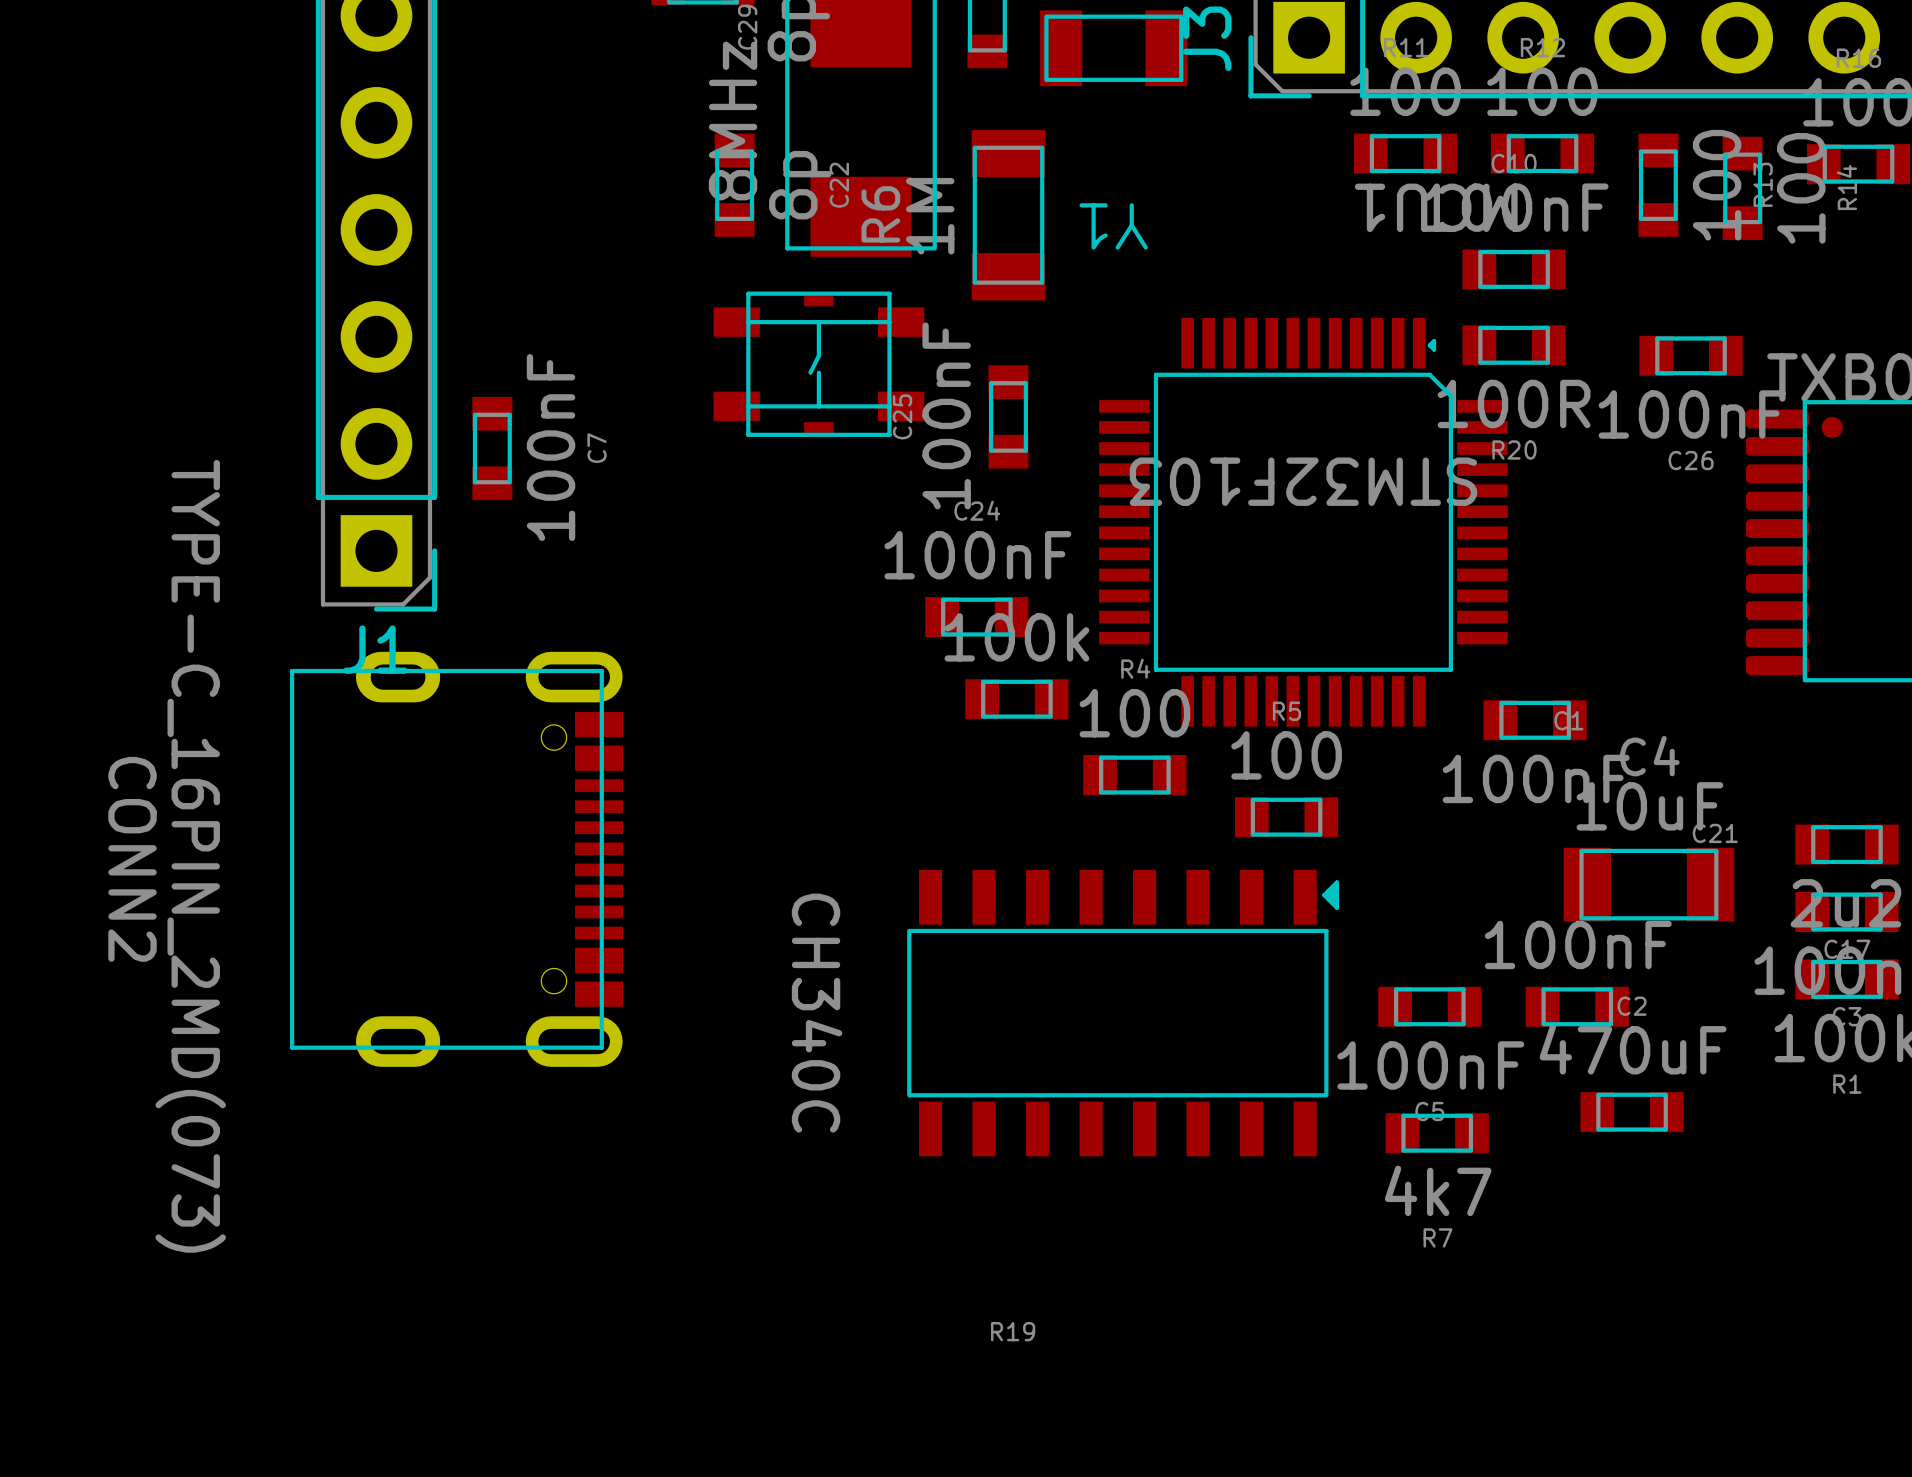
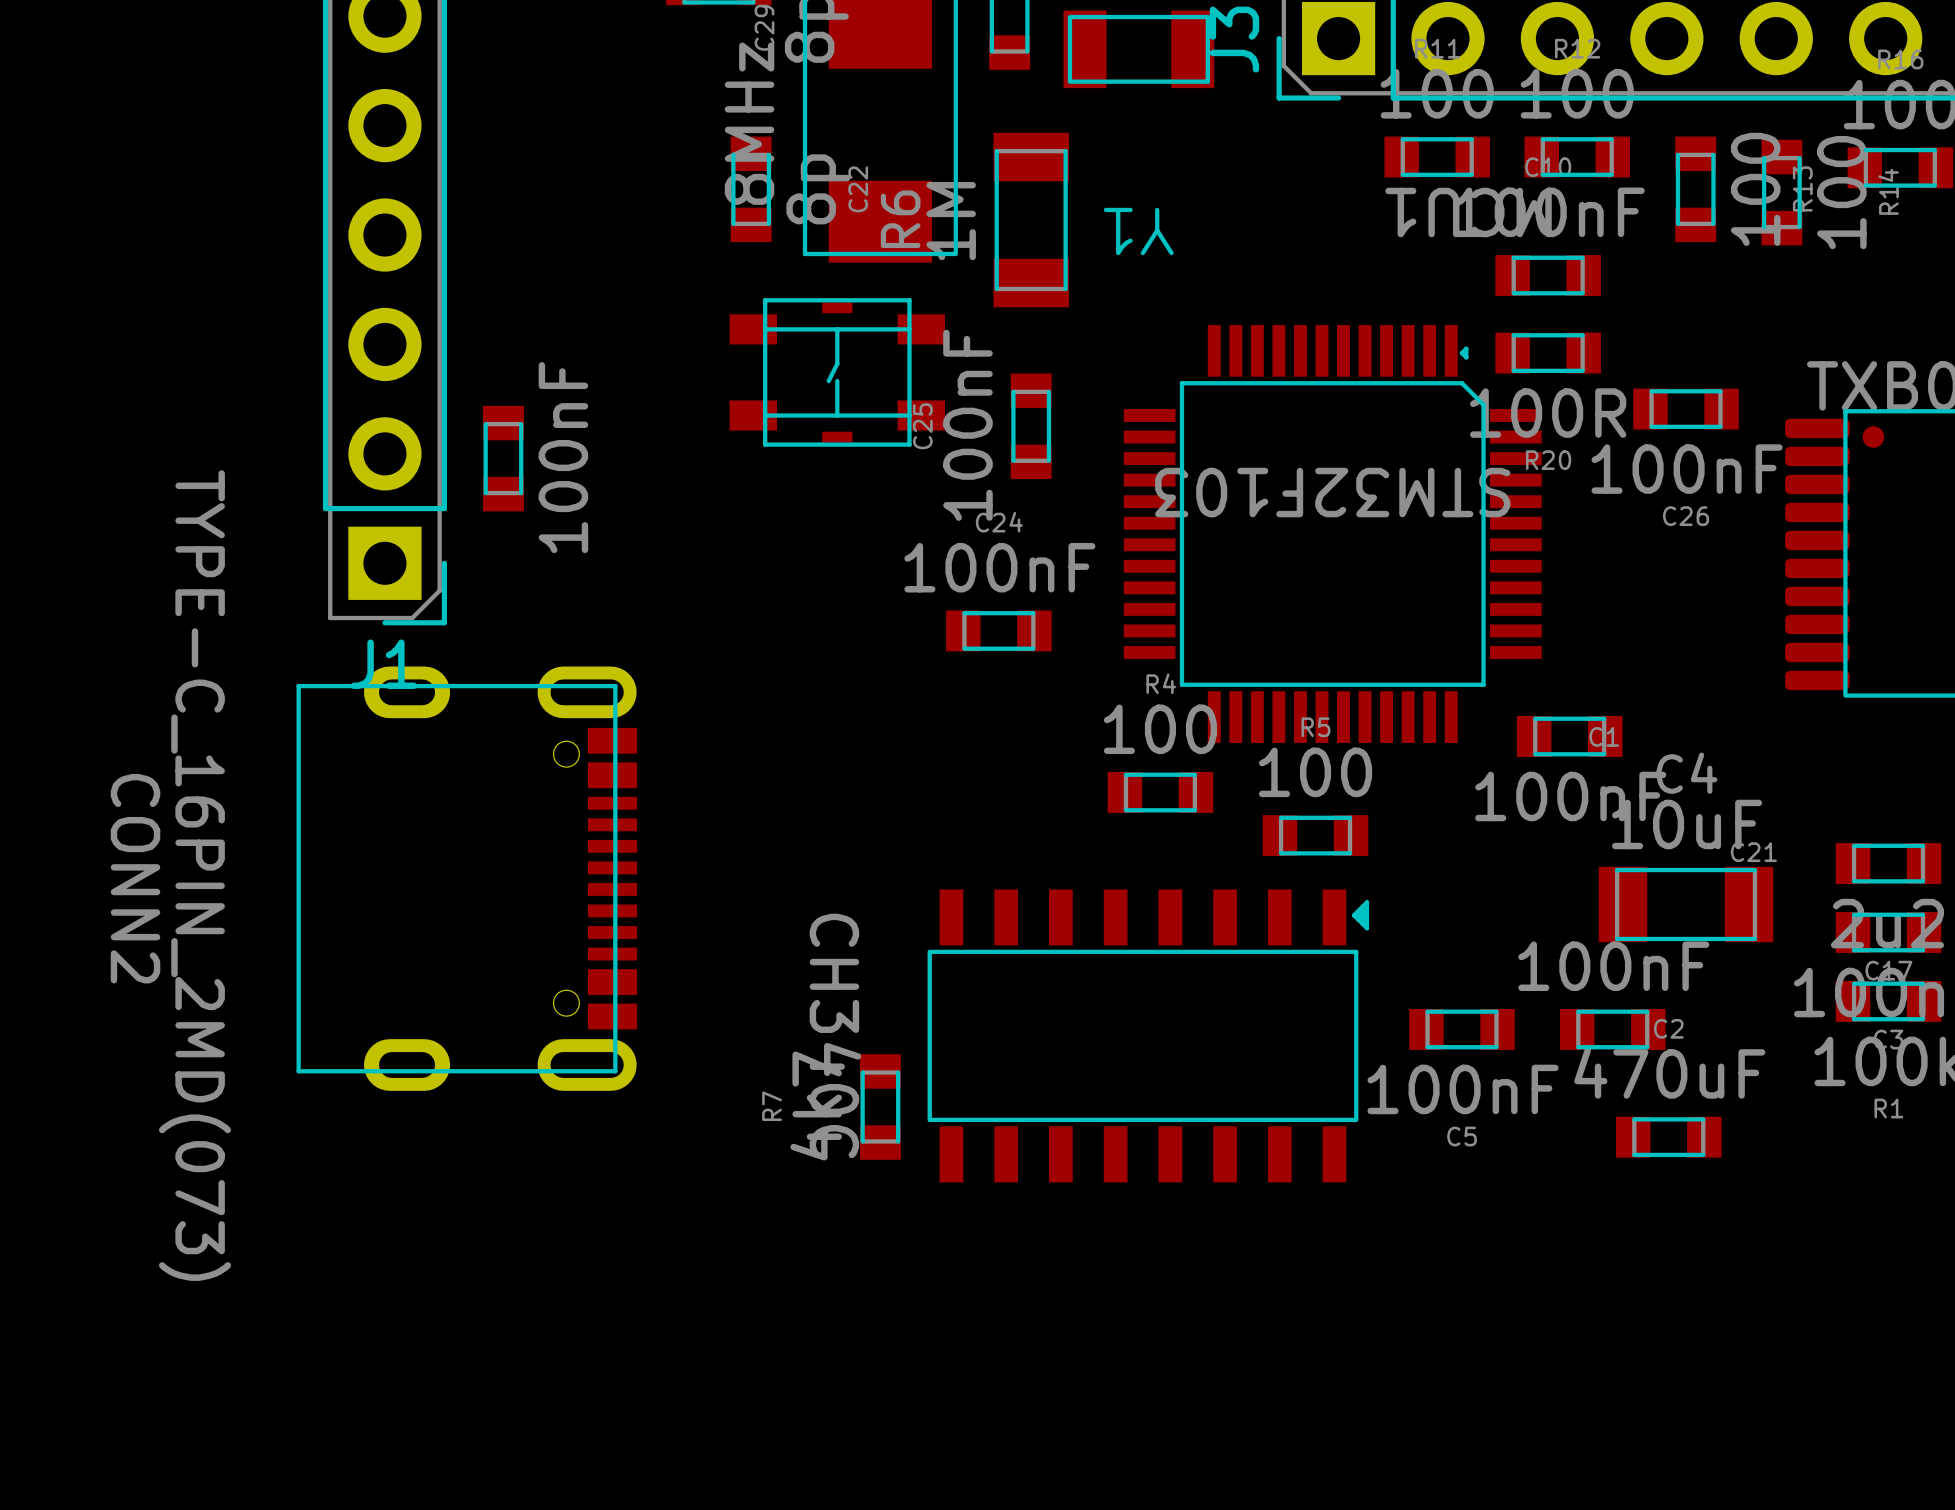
C26 position: (1691, 355) -> (1686, 409)
C7 name: C7 (597, 448) -> none
R19: 100k (1016, 699) -> none
R7 rotation: 0° (1437, 1133) -> 90° clockwise (880, 1107)
R7 position: (1437, 1133) -> (880, 1107)

